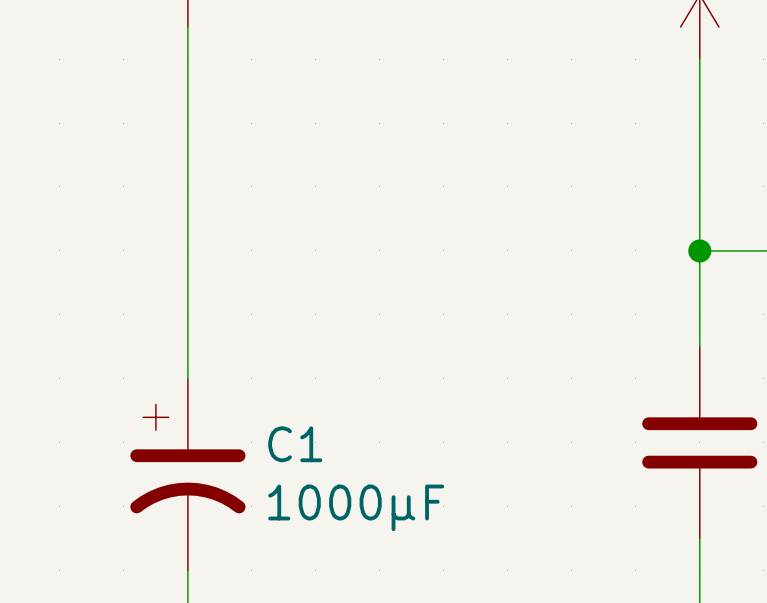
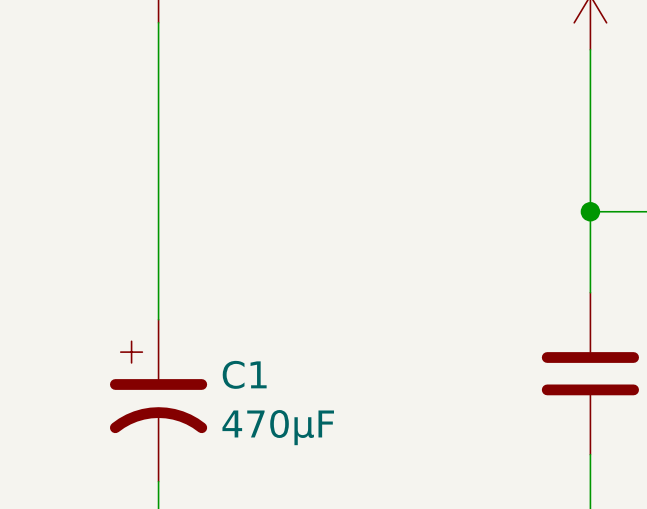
C1 value: 1000µF (356, 507) -> 470µF (278, 427)

